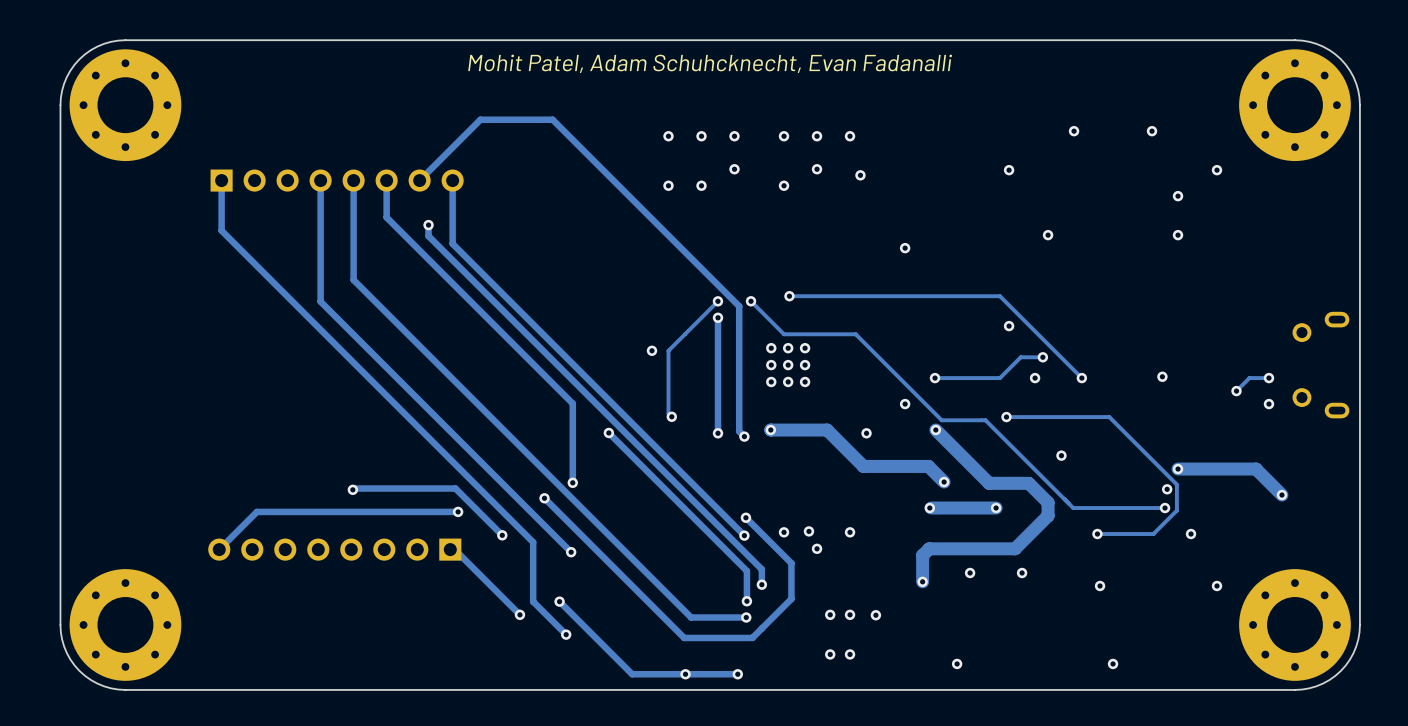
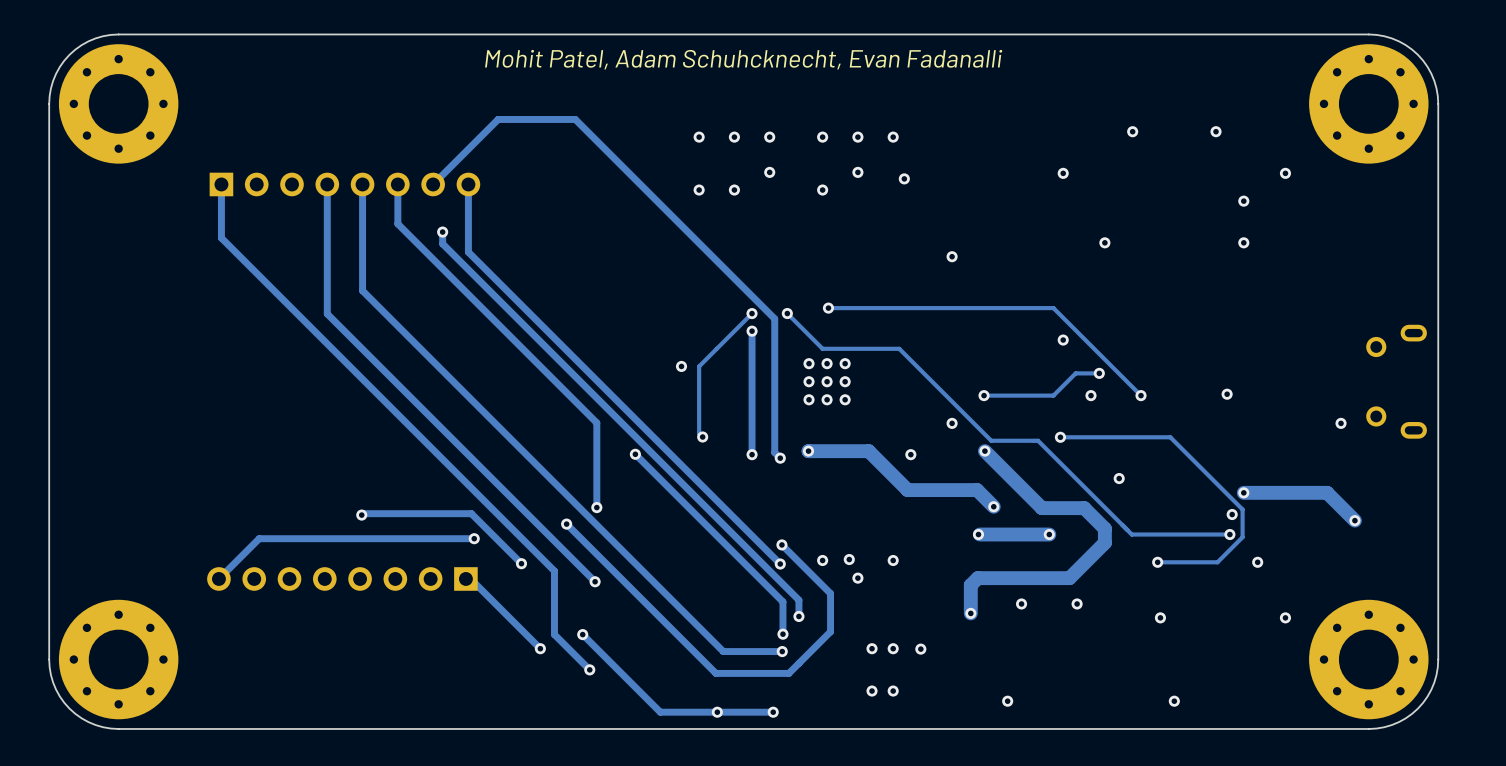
track: (1268, 378) (1249, 378) (1236, 391) -> none
via: (1268, 378) -> none
via: (1236, 391) -> none

